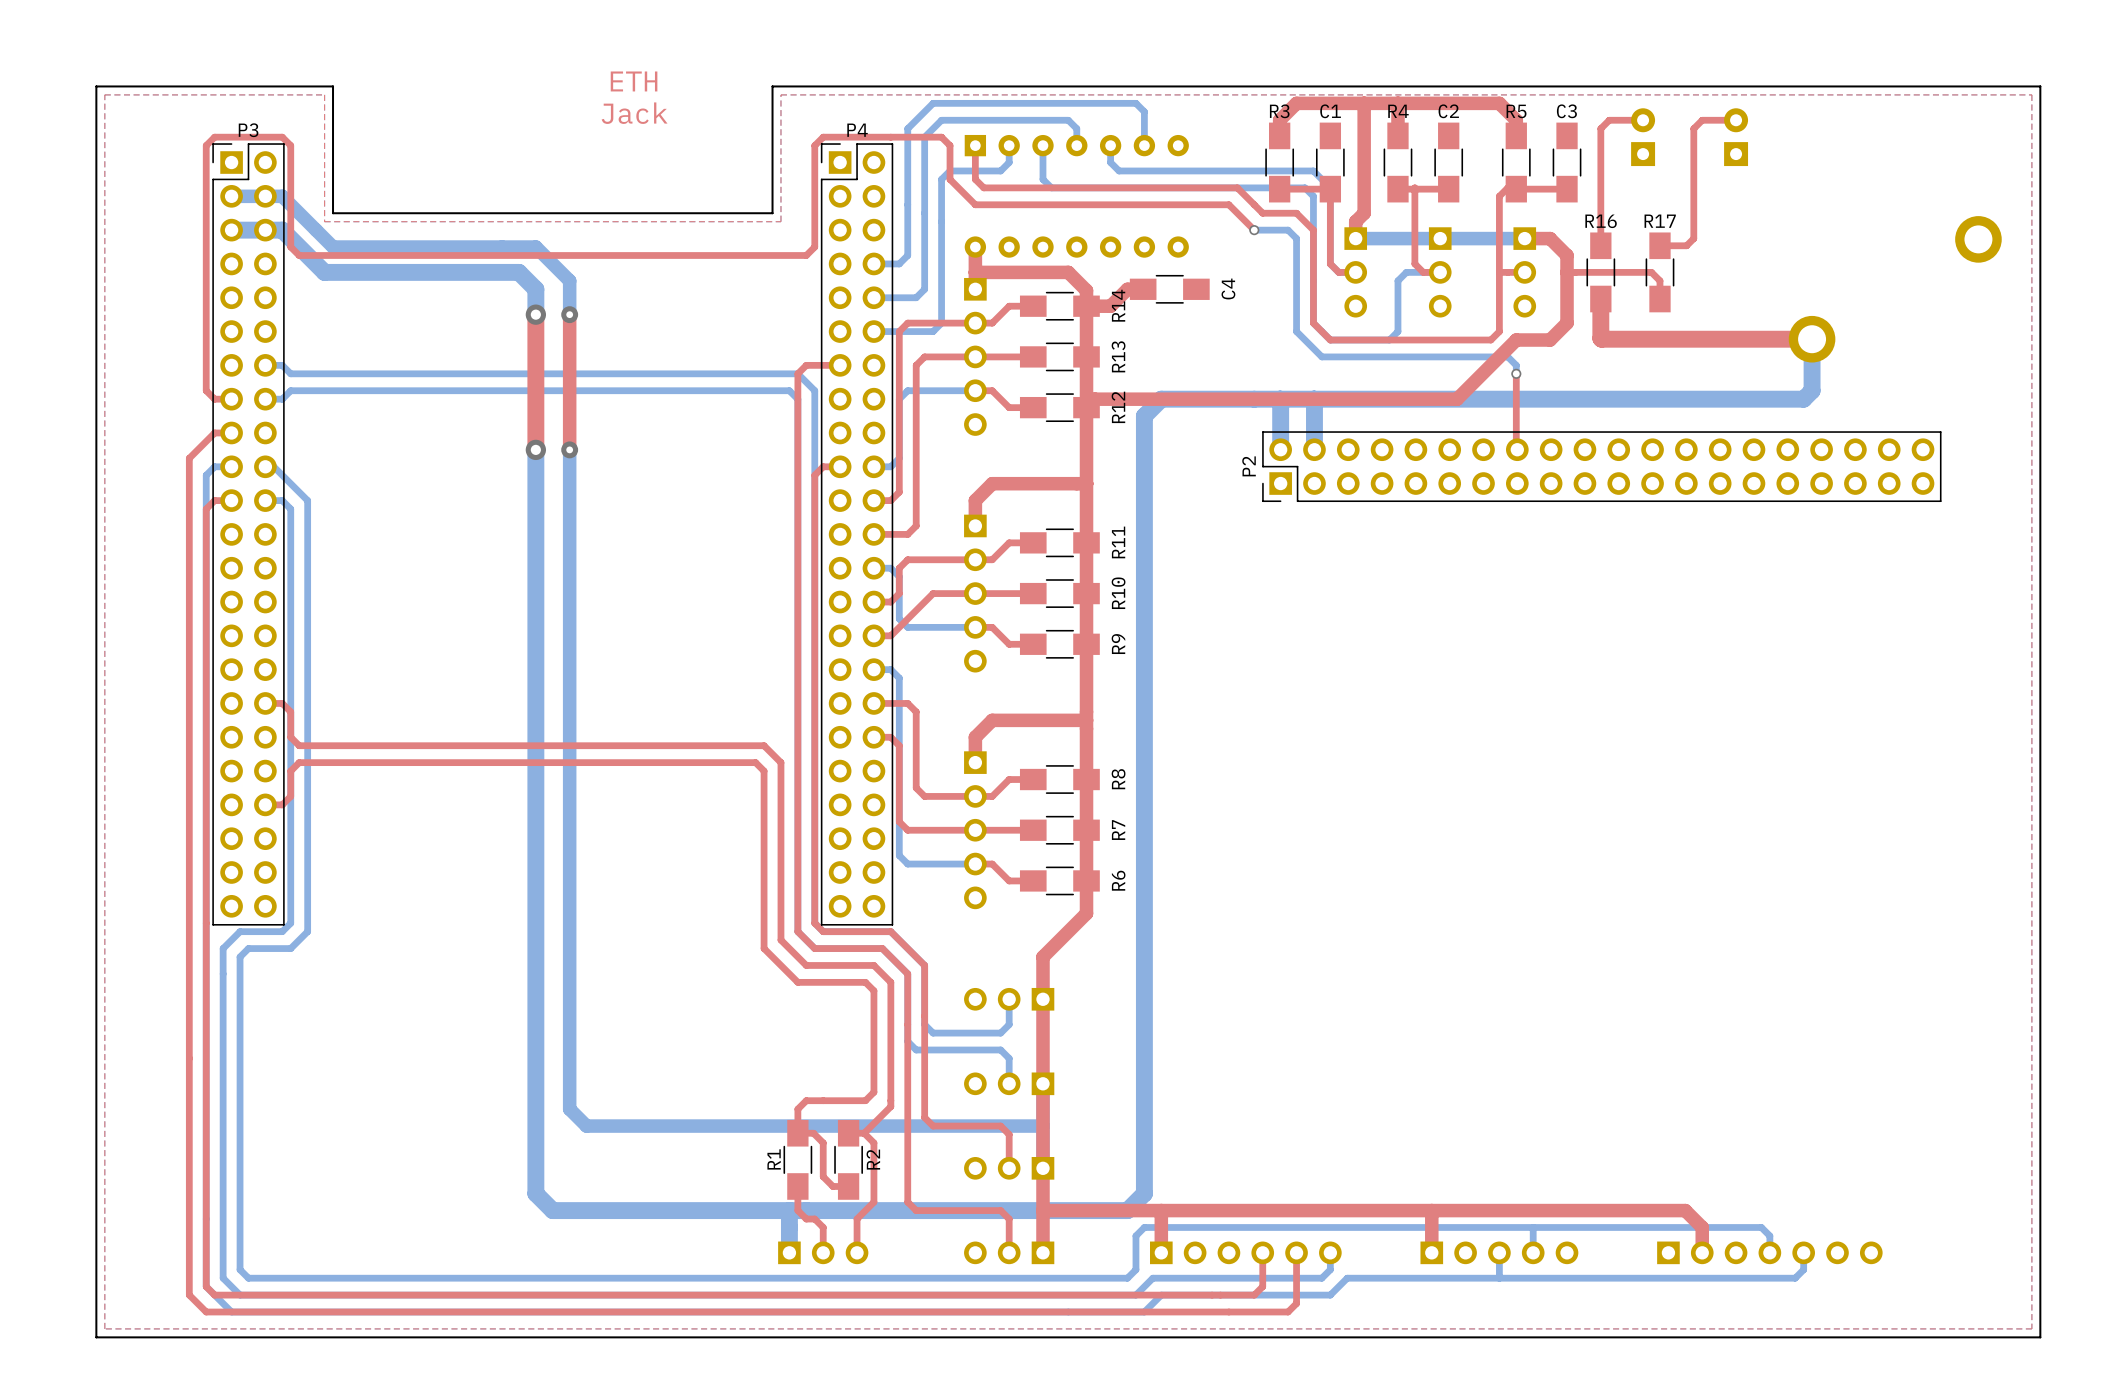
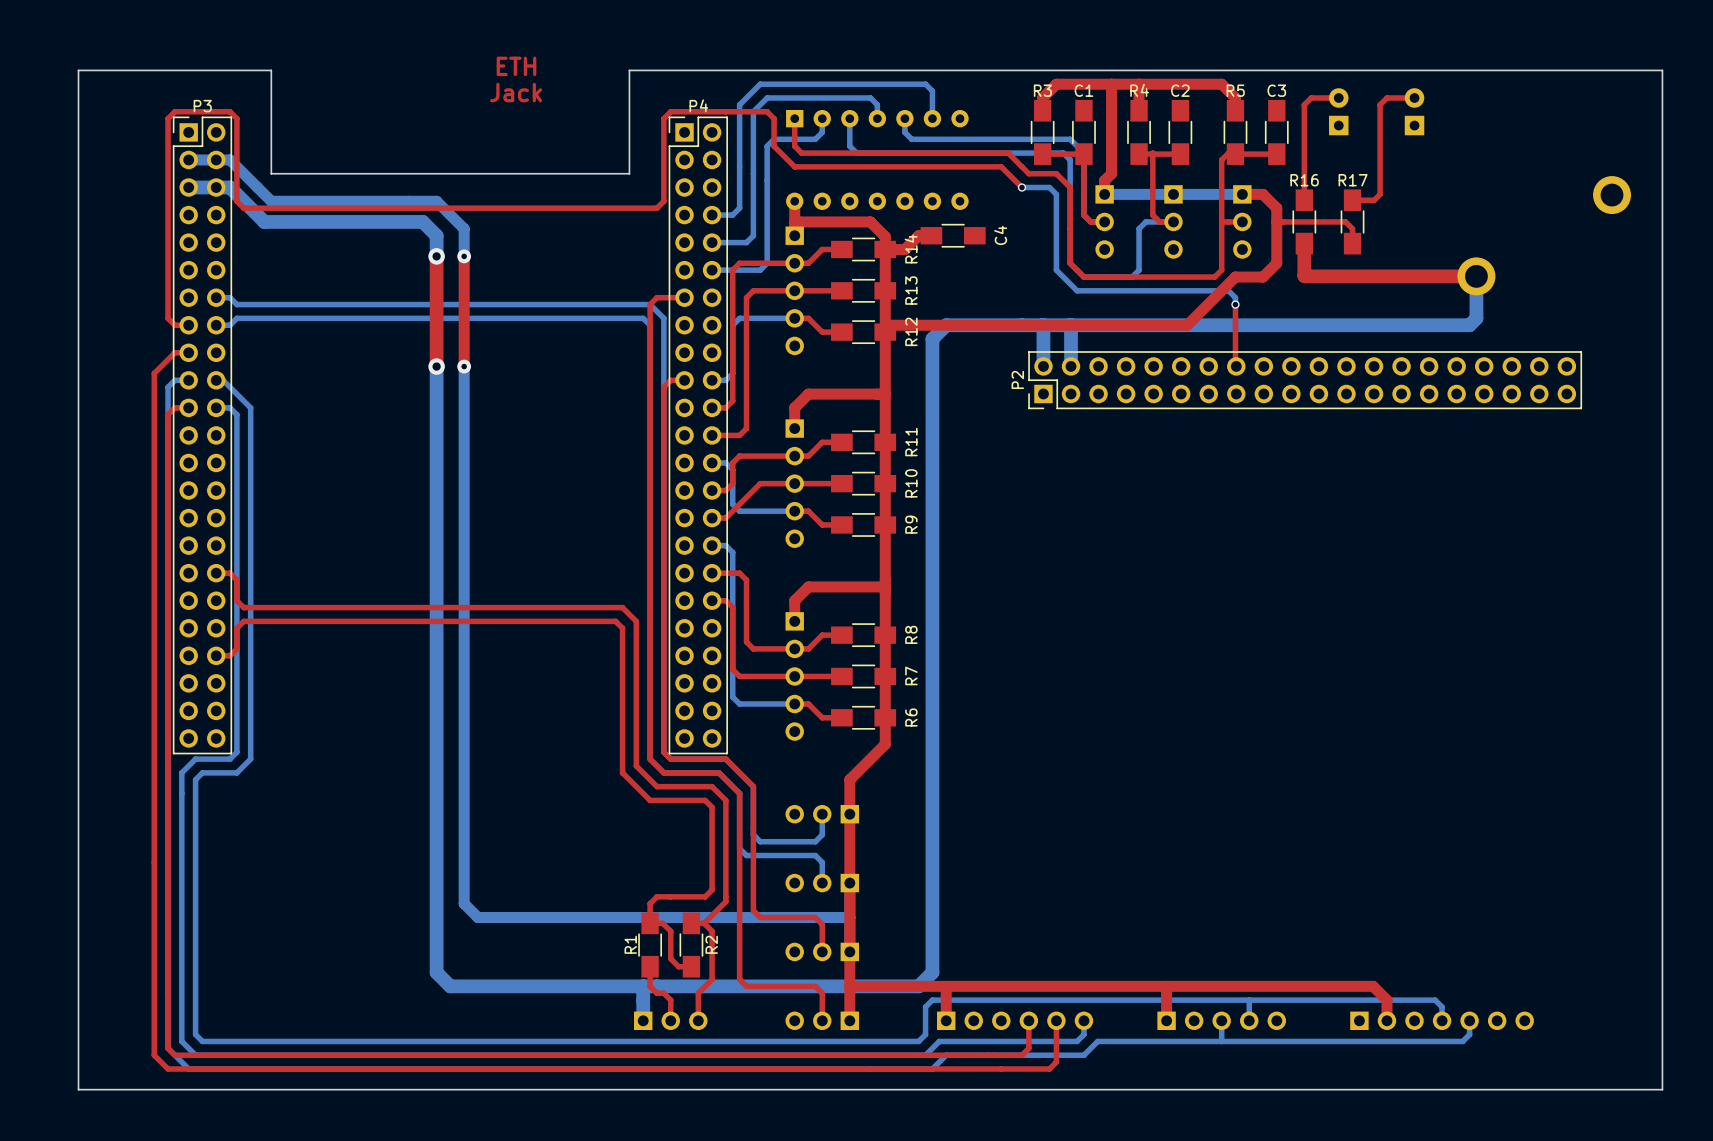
top zone outline: (104, 94) (324, 94) (324, 221) (780, 221) (780, 94) (2031, 94) (2031, 1328) (104, 1328) (104, 94) -> none

